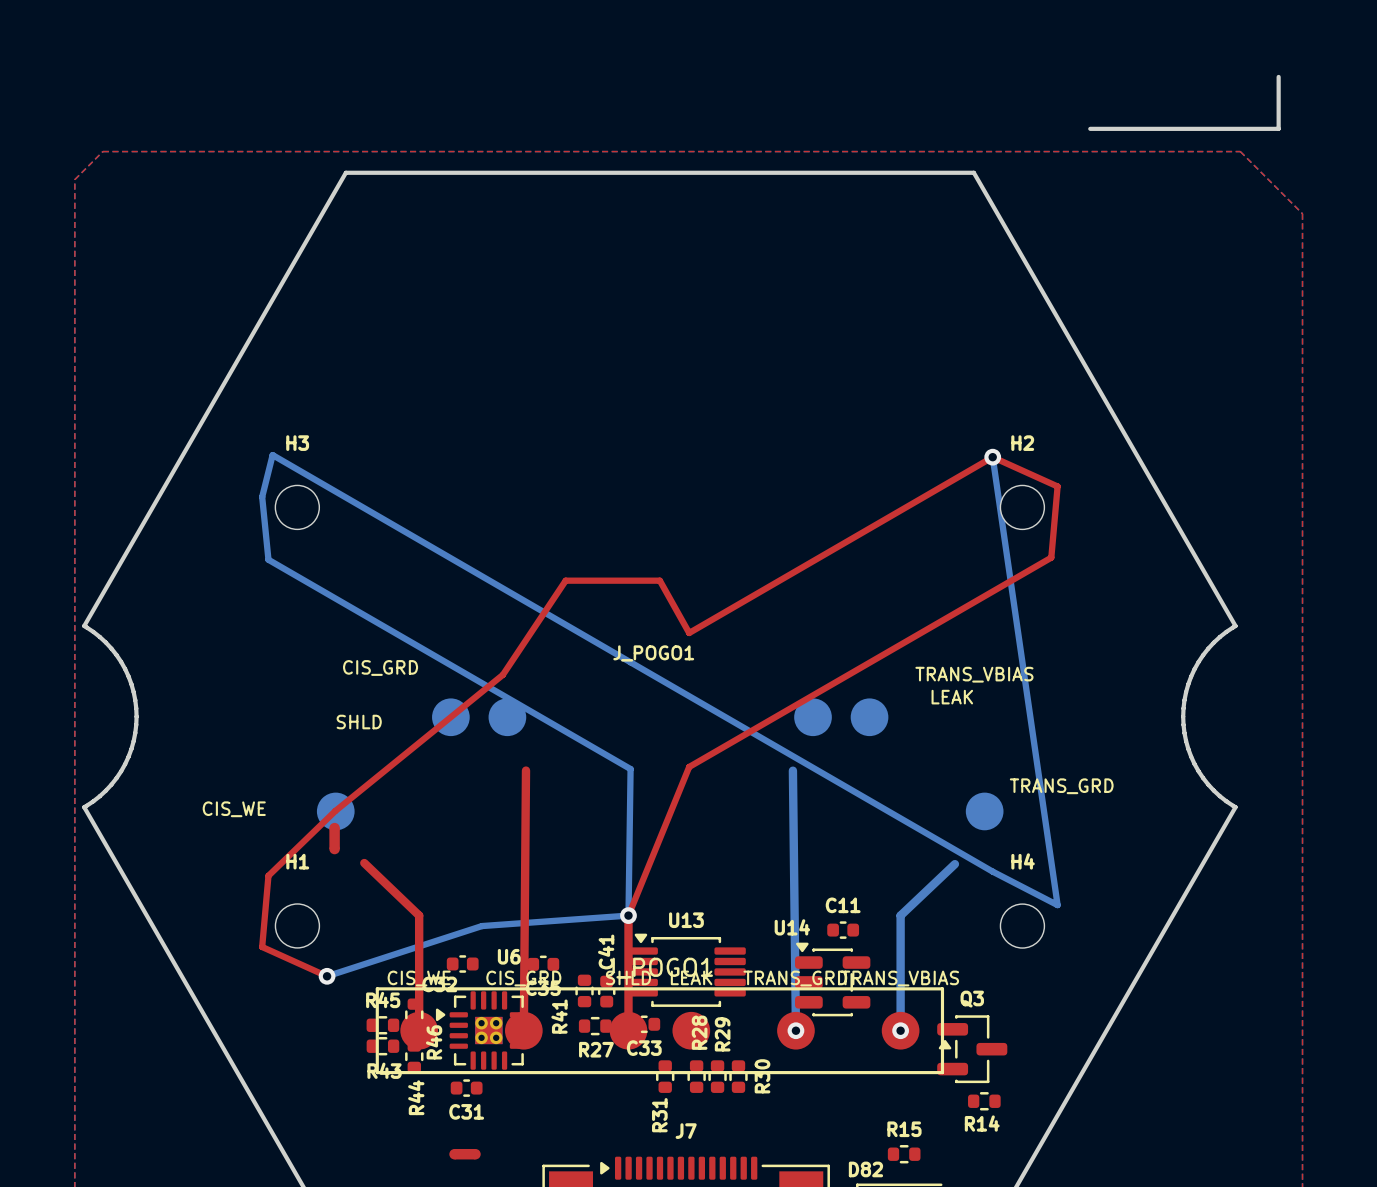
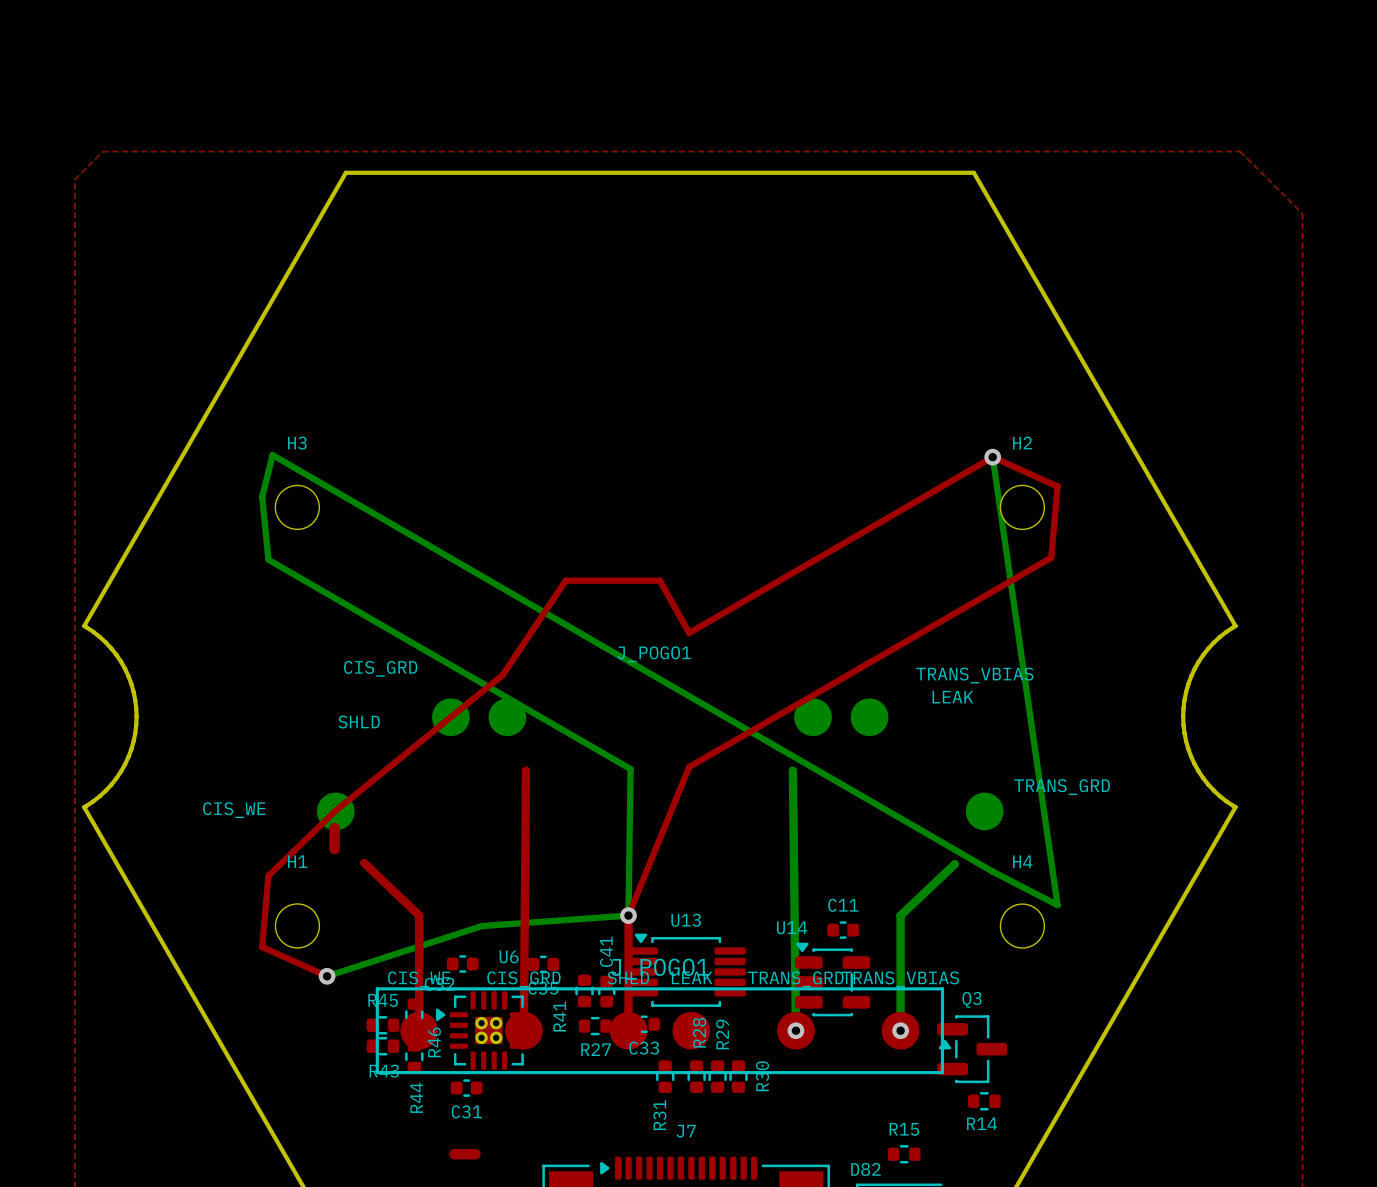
board edge: (1278, 76) (1278, 128) (1090, 128) -> none

